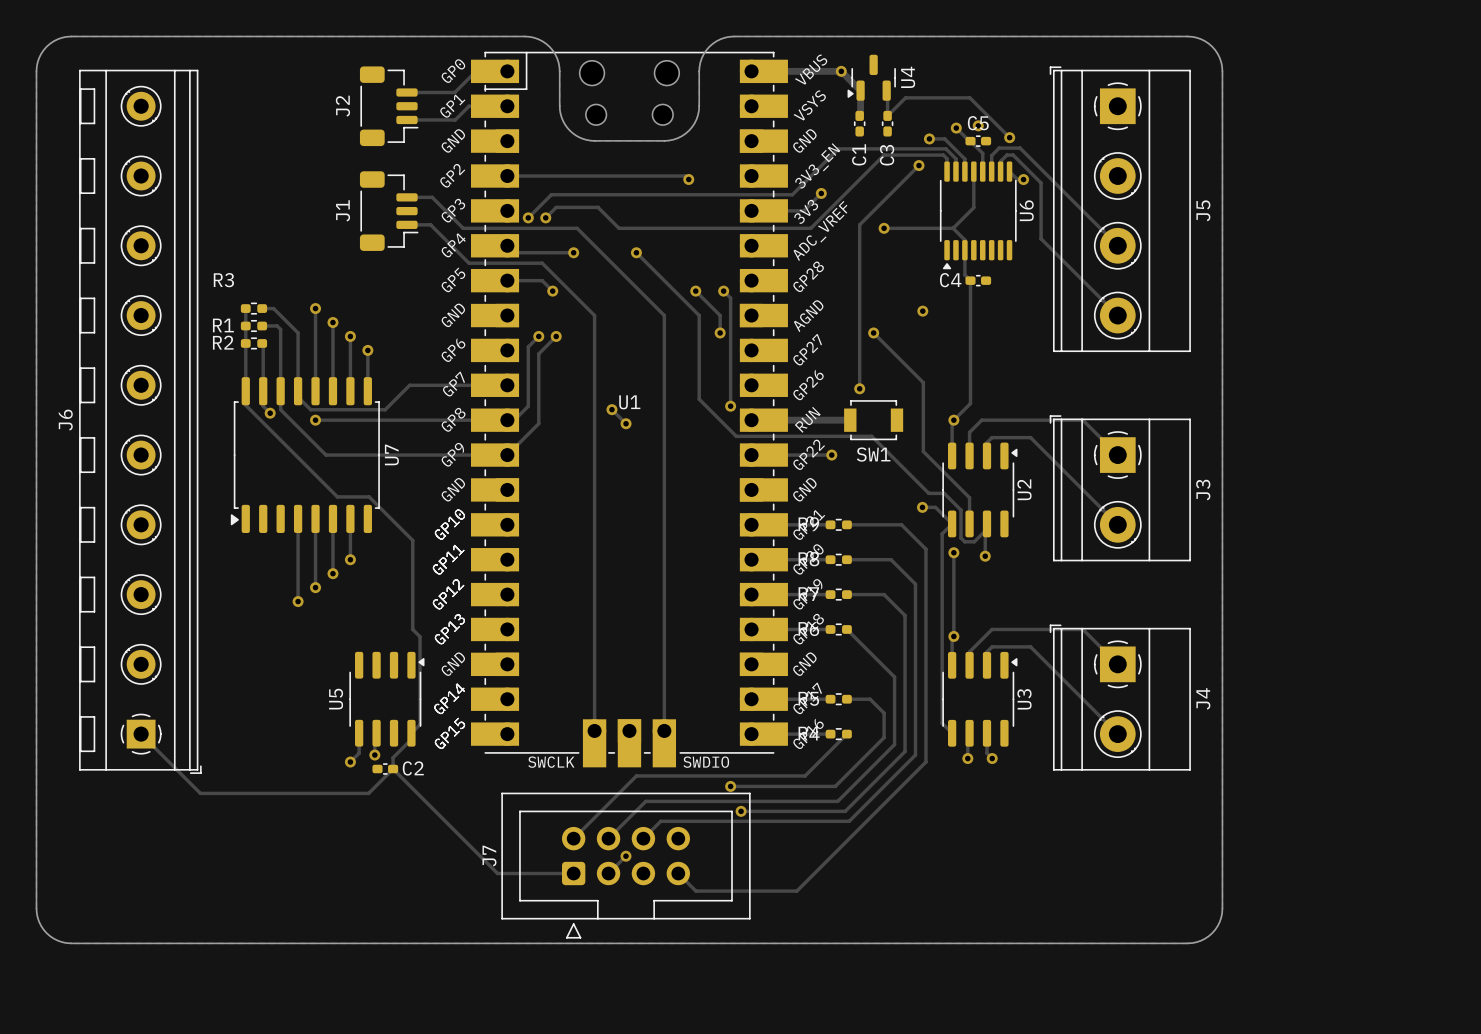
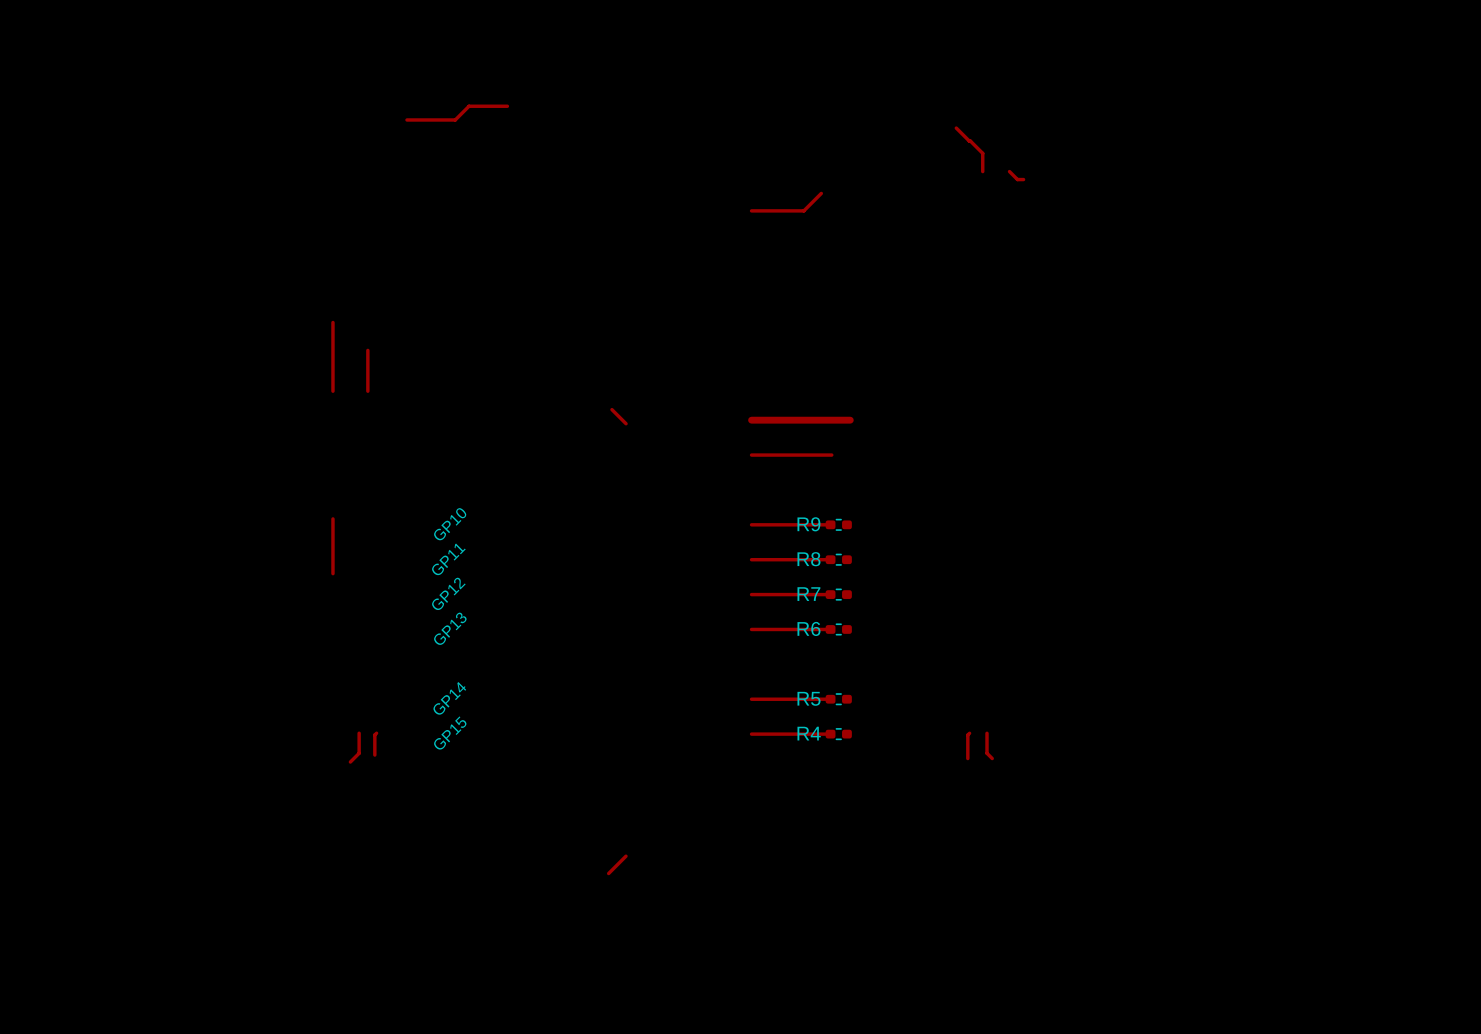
board edge: (71, 36) (533, 37) (549, 46) (557, 58) (559, 71) (559, 109) (565, 124) (576, 135) (594, 140) (668, 140) (685, 133) (692, 127) (698, 115) (699, 66) (701, 58) (712, 43) (729, 36) (1187, 36) (1196, 37) (1208, 43) (1217, 53) (1222, 71) (1222, 908) (1221, 917) (1215, 929) (1200, 940) (1187, 943) (71, 943) (62, 942) (50, 936) (39, 921) (36, 908) (36, 71) (39, 58) (46, 46) (58, 39) (71, 36) -> none
track: (507, 71) (475, 71) (454, 92) (406, 92) -> none
track: (751, 71) (841, 71) (860, 90) (859, 115) -> none
via: (841, 71) -> none
U4: (871, 77) -> none
track: (886, 90) (887, 115) (905, 97) (969, 97) (1009, 137) -> none
J2: (389, 106) -> none
C1: (859, 123) -> none
C3: (887, 123) -> none
via: (978, 125) -> none
via: (956, 128) -> none
via: (1009, 137) -> none
track: (929, 138) (944, 138) (964, 159) (964, 171) -> none
via: (929, 138) -> none
C5: (978, 141) -> none
track: (918, 165) (859, 224) (859, 388) -> none
via: (918, 165) -> none
track: (947, 171) (947, 158) (943, 155) (884, 155) (810, 228) (619, 228) (598, 207) (556, 207) (545, 217) -> none
track: (955, 171) (955, 158) (945, 148) (838, 148) (792, 194) (551, 194) (528, 217) -> none
track: (973, 171) (973, 207) (953, 228) -> none
track: (991, 171) (991, 155) (999, 148) (1020, 148) (1117, 245) -> none
track: (1000, 171) (1000, 161) (1006, 155) (1013, 155) (1041, 182) (1041, 238) (1117, 315) -> none
track: (507, 176) (685, 176) (688, 179) -> none
via: (688, 179) -> none
via: (1023, 179) -> none
via: (821, 193) -> none
track: (406, 197) (432, 197) (463, 228) (577, 228) (664, 315) (664, 730) -> none
J5: (1120, 209) -> none
J1: (389, 211) -> none
U6: (978, 215) -> none
via: (528, 217) -> none
via: (545, 217) -> none
track: (406, 224) (430, 224) (469, 263) (542, 263) (594, 315) (594, 730) -> none
track: (884, 228) (953, 228) -> none
via: (884, 228) -> none
track: (953, 228) (964, 240) (964, 275) (970, 280) (970, 403) (952, 421) (952, 455) -> none
track: (507, 245) (514, 252) (573, 252) -> none
via: (573, 252) -> none
track: (636, 252) (699, 315) (699, 399) (736, 436) (871, 436) (928, 493) (944, 493) (960, 510) (960, 538) (964, 541) (974, 541) (987, 529) (987, 523) (985, 525) (985, 556) -> none
via: (636, 252) -> none
track: (507, 280) (542, 280) (552, 291) -> none
C4: (978, 280) -> none
via: (552, 291) -> none
track: (695, 291) (720, 315) (720, 332) -> none
via: (695, 291) -> none
track: (723, 291) (730, 298) (730, 406) -> none
via: (723, 291) -> none
track: (245, 308) (245, 405) (337, 496) (369, 496) (412, 540) (412, 629) (420, 636) (420, 724) (411, 733) (411, 739) (393, 757) (393, 768) -> none
R3: (253, 308) -> none
track: (263, 308) (273, 308) (298, 332) (298, 397) (310, 409) (385, 409) (409, 385) (507, 385) -> none
track: (315, 308) (315, 391) -> none
via: (315, 308) -> none
via: (922, 311) -> none
via: (332, 322) -> none
R1: (253, 326) -> none
track: (263, 326) (277, 326) (280, 329) (280, 409) (326, 455) (507, 455) (538, 423) (538, 353) (556, 336) -> none
via: (720, 332) -> none
track: (873, 332) (923, 382) (923, 451) (969, 497) (969, 523) -> none
via: (873, 332) -> none
track: (350, 336) (350, 391) -> none
via: (350, 336) -> none
track: (538, 336) (528, 346) (528, 406) (514, 420) (315, 420) -> none
via: (538, 336) -> none
via: (556, 336) -> none
R2: (253, 343) -> none
track: (263, 343) (263, 406) (270, 413) -> none
via: (367, 350) -> none
via: (859, 388) -> none
via: (730, 406) -> none
via: (611, 409) -> none
U1: (629, 409) -> none
via: (270, 413) -> none
via: (315, 420) -> none
SW1: (873, 420) -> none
via: (953, 420) -> none
J6: (140, 421) -> none
via: (626, 423) -> none
U7: (305, 455) -> none
via: (831, 455) -> none
track: (987, 455) (987, 442) (991, 437) (1030, 437) (1117, 524) -> none
track: (1117, 455) (1082, 420) (981, 420) (969, 432) (969, 455) -> none
J3: (1120, 488) -> none
U2: (979, 489) -> none
track: (922, 507) (935, 507) (952, 523) (942, 533) (942, 723) (952, 733) -> none
via: (922, 507) -> none
track: (298, 518) (298, 601) -> none
track: (315, 518) (315, 587) -> none
track: (350, 518) (350, 559) -> none
track: (846, 524) (901, 524) (925, 549) (925, 762) (796, 891) (695, 891) (678, 873) -> none
track: (953, 552) (952, 665) -> none
via: (953, 552) -> none
via: (985, 556) -> none
via: (350, 559) -> none
track: (846, 559) (891, 559) (915, 584) (915, 755) (849, 821) (660, 821) (643, 838) -> none
via: (332, 573) -> none
via: (315, 587) -> none
track: (846, 594) (884, 594) (905, 615) (905, 751) (845, 811) (741, 811) -> none
via: (298, 601) -> none
track: (846, 629) (894, 677) (894, 744) (837, 801) (645, 801) (608, 838) -> none
via: (953, 636) -> none
track: (1117, 664) (1082, 629) (992, 629) (969, 651) (969, 665) -> none
track: (987, 665) (987, 651) (992, 646) (1030, 646) (1117, 734) -> none
J4: (1120, 697) -> none
U5: (386, 699) -> none
track: (846, 699) (870, 699) (884, 713) (884, 737) (835, 786) (730, 786) -> none
U3: (979, 699) -> none
track: (141, 734) (200, 793) (368, 793) (393, 768) -> none
track: (846, 734) (805, 775) (636, 775) (573, 838) -> none
via: (374, 755) -> none
via: (967, 758) -> none
via: (992, 758) -> none
via: (350, 762) -> none
C2: (385, 768) -> none
track: (393, 768) (497, 873) (573, 873) -> none
via: (730, 786) -> none
via: (741, 811) -> none
via: (625, 856) -> none
J7: (625, 865) -> none

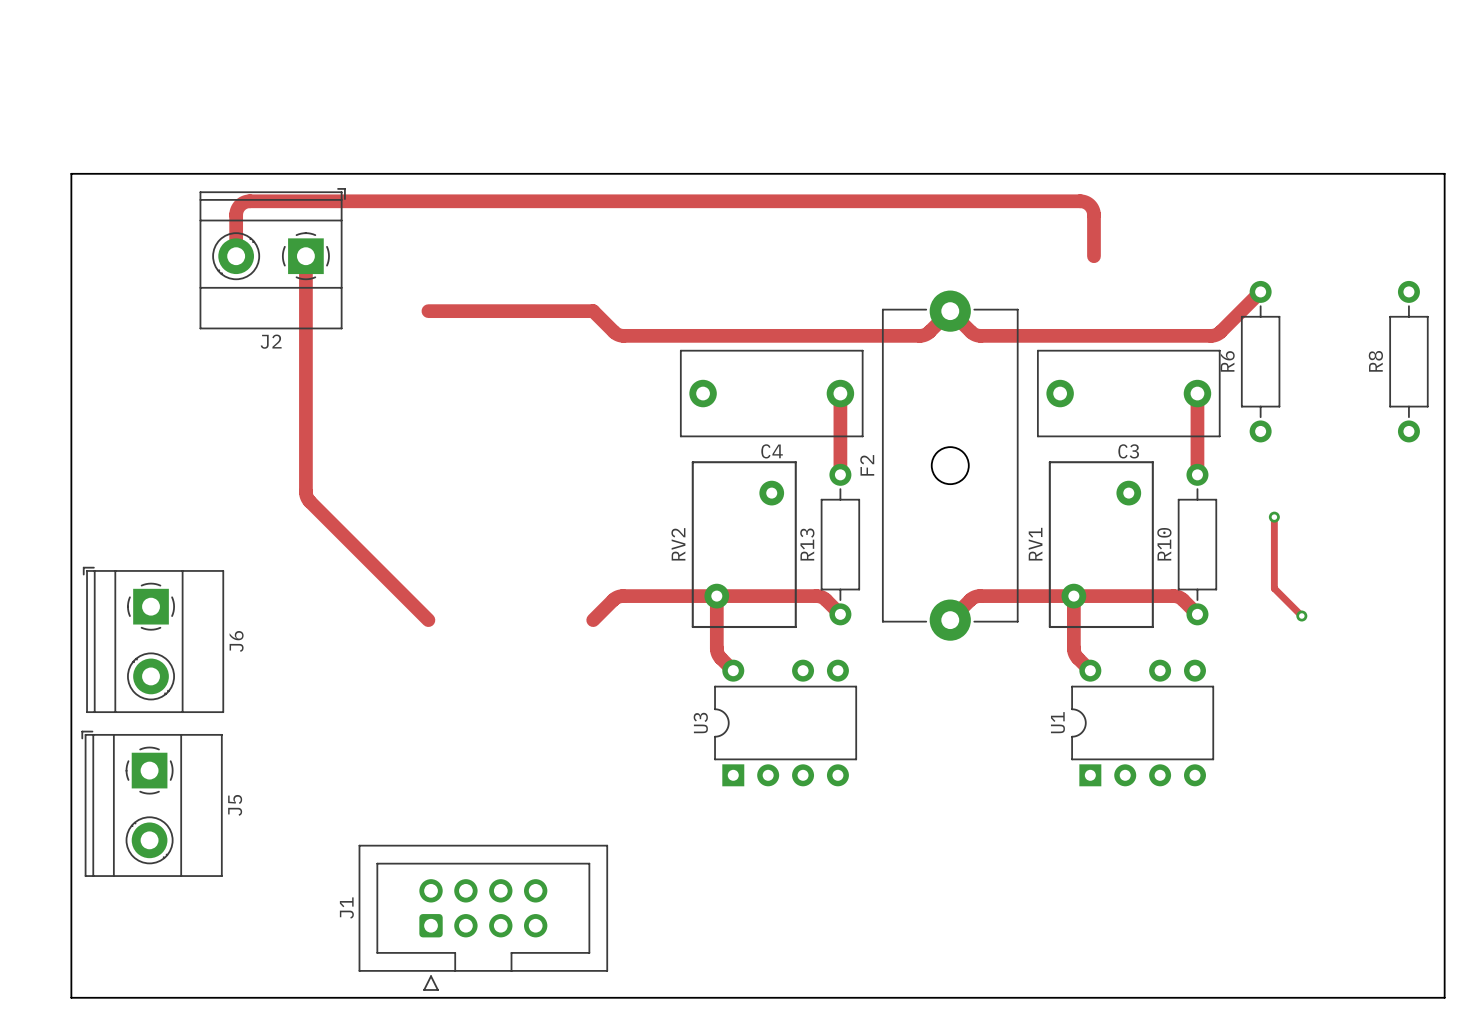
track: (507, 106) (469, 106) (455, 119) (406, 119) -> none
track: (956, 128) (982, 153) (982, 171) -> none
track: (1009, 171) (1017, 179) (1023, 179) -> none
board edge: none -> (71, 173) (1444, 173) (1444, 997) (71, 997) (71, 173)
track: (821, 193) (803, 210) (751, 210) -> none
track: none -> (236, 256) (236, 211) (241, 204) (249, 201) (1081, 201) (1089, 205) (1093, 211) (1093, 256)
track: none -> (305, 256) (306, 495) (309, 501) (428, 620)
J2: none -> (272, 258)
track: none -> (1260, 291) (1219, 332) (1211, 335) (979, 335) (971, 332) (950, 311) (928, 332) (921, 335) (623, 335) (614, 332) (593, 311) (428, 311)
track: (332, 322) (332, 391) -> none
track: (367, 350) (367, 391) -> none
C4: none -> (771, 393)
track: none -> (840, 393) (840, 474)
C3: none -> (1128, 393)
track: none -> (1197, 393) (1197, 474)
track: (611, 409) (626, 423) -> none
track: (751, 420) (850, 420) -> none
track: (751, 455) (831, 455) -> none
F2: none -> (950, 465)
track: none -> (1274, 517) (1274, 588) (1301, 616)
via: none -> (1274, 517)
track: (332, 518) (332, 573) -> none
text: GP10 (450, 524) -> none
track: (751, 524) (830, 524) -> none
R9: (838, 524) -> none
RV2: none -> (744, 544)
R13: none -> (840, 544)
RV1: none -> (1101, 544)
R10: none -> (1197, 544)
R8 footprint: [825, 553, 852, 566] -> [1389, 280, 1429, 443]
text: GP11 (448, 559) -> none
track: (751, 559) (830, 559) -> none
text: GP12 (448, 593) -> none
track: (751, 594) (830, 594) -> none
R7: (838, 594) -> none
track: none -> (716, 596) (717, 651) (719, 657) (733, 670)
track: none -> (1073, 596) (1074, 651) (1076, 657) (1090, 670)
track: none -> (840, 614) (825, 599) (817, 596) (622, 596) (614, 599) (593, 620)
track: none -> (1197, 614) (1182, 599) (1174, 596) (979, 596) (971, 599) (950, 620)
via: none -> (1301, 616)
R6 footprint: [825, 623, 852, 636] -> [1240, 280, 1281, 443]
text: GP13 (450, 628) -> none
track: (751, 629) (830, 629) -> none
J6: none -> (153, 639)
text: GP14 (449, 698) -> none
track: (751, 699) (830, 699) -> none
R5: (838, 699) -> none
U3: none -> (785, 722)
U1: none -> (1142, 722)
track: (359, 733) (359, 753) (350, 762) -> none
track: (376, 733) (374, 734) (374, 755) -> none
text: GP15 (450, 733) -> none
track: (969, 733) (967, 735) (967, 758) -> none
track: (987, 733) (987, 753) (992, 758) -> none
track: (751, 734) (830, 734) -> none
R4: (838, 734) -> none
J5: none -> (152, 803)
track: (625, 856) (608, 873) -> none
J1: none -> (483, 917)

